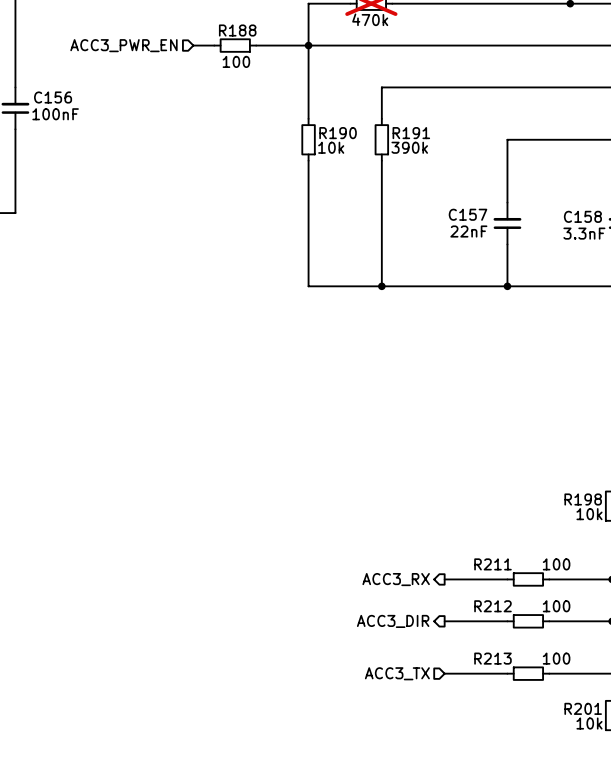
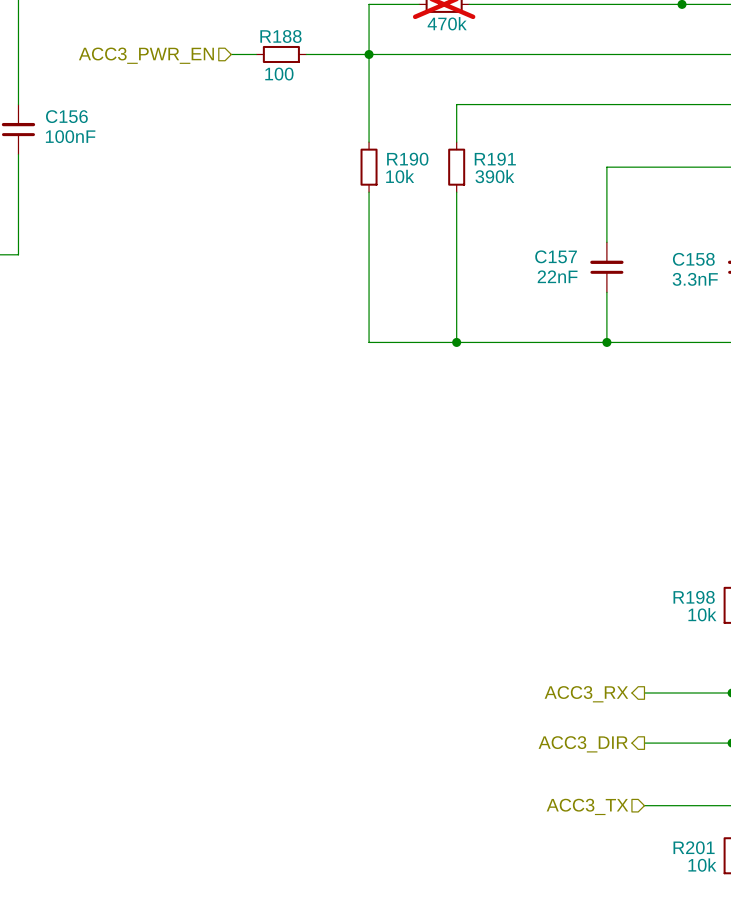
hierarchical label position: ACC3_RX (396, 579) -> ACC3_RX (586, 694)
wire: (444, 579) (507, 579) -> none
R211: 100 (528, 579) -> none
hierarchical label position: ACC3_DIR (393, 621) -> ACC3_DIR (583, 744)
wire: (444, 621) (507, 621) -> none
R212: 100 (528, 621) -> none
hierarchical label position: ACC3_TX (397, 673) -> ACC3_TX (587, 806)
wire: (444, 673) (507, 673) -> none
R213: 100 (528, 673) -> none

